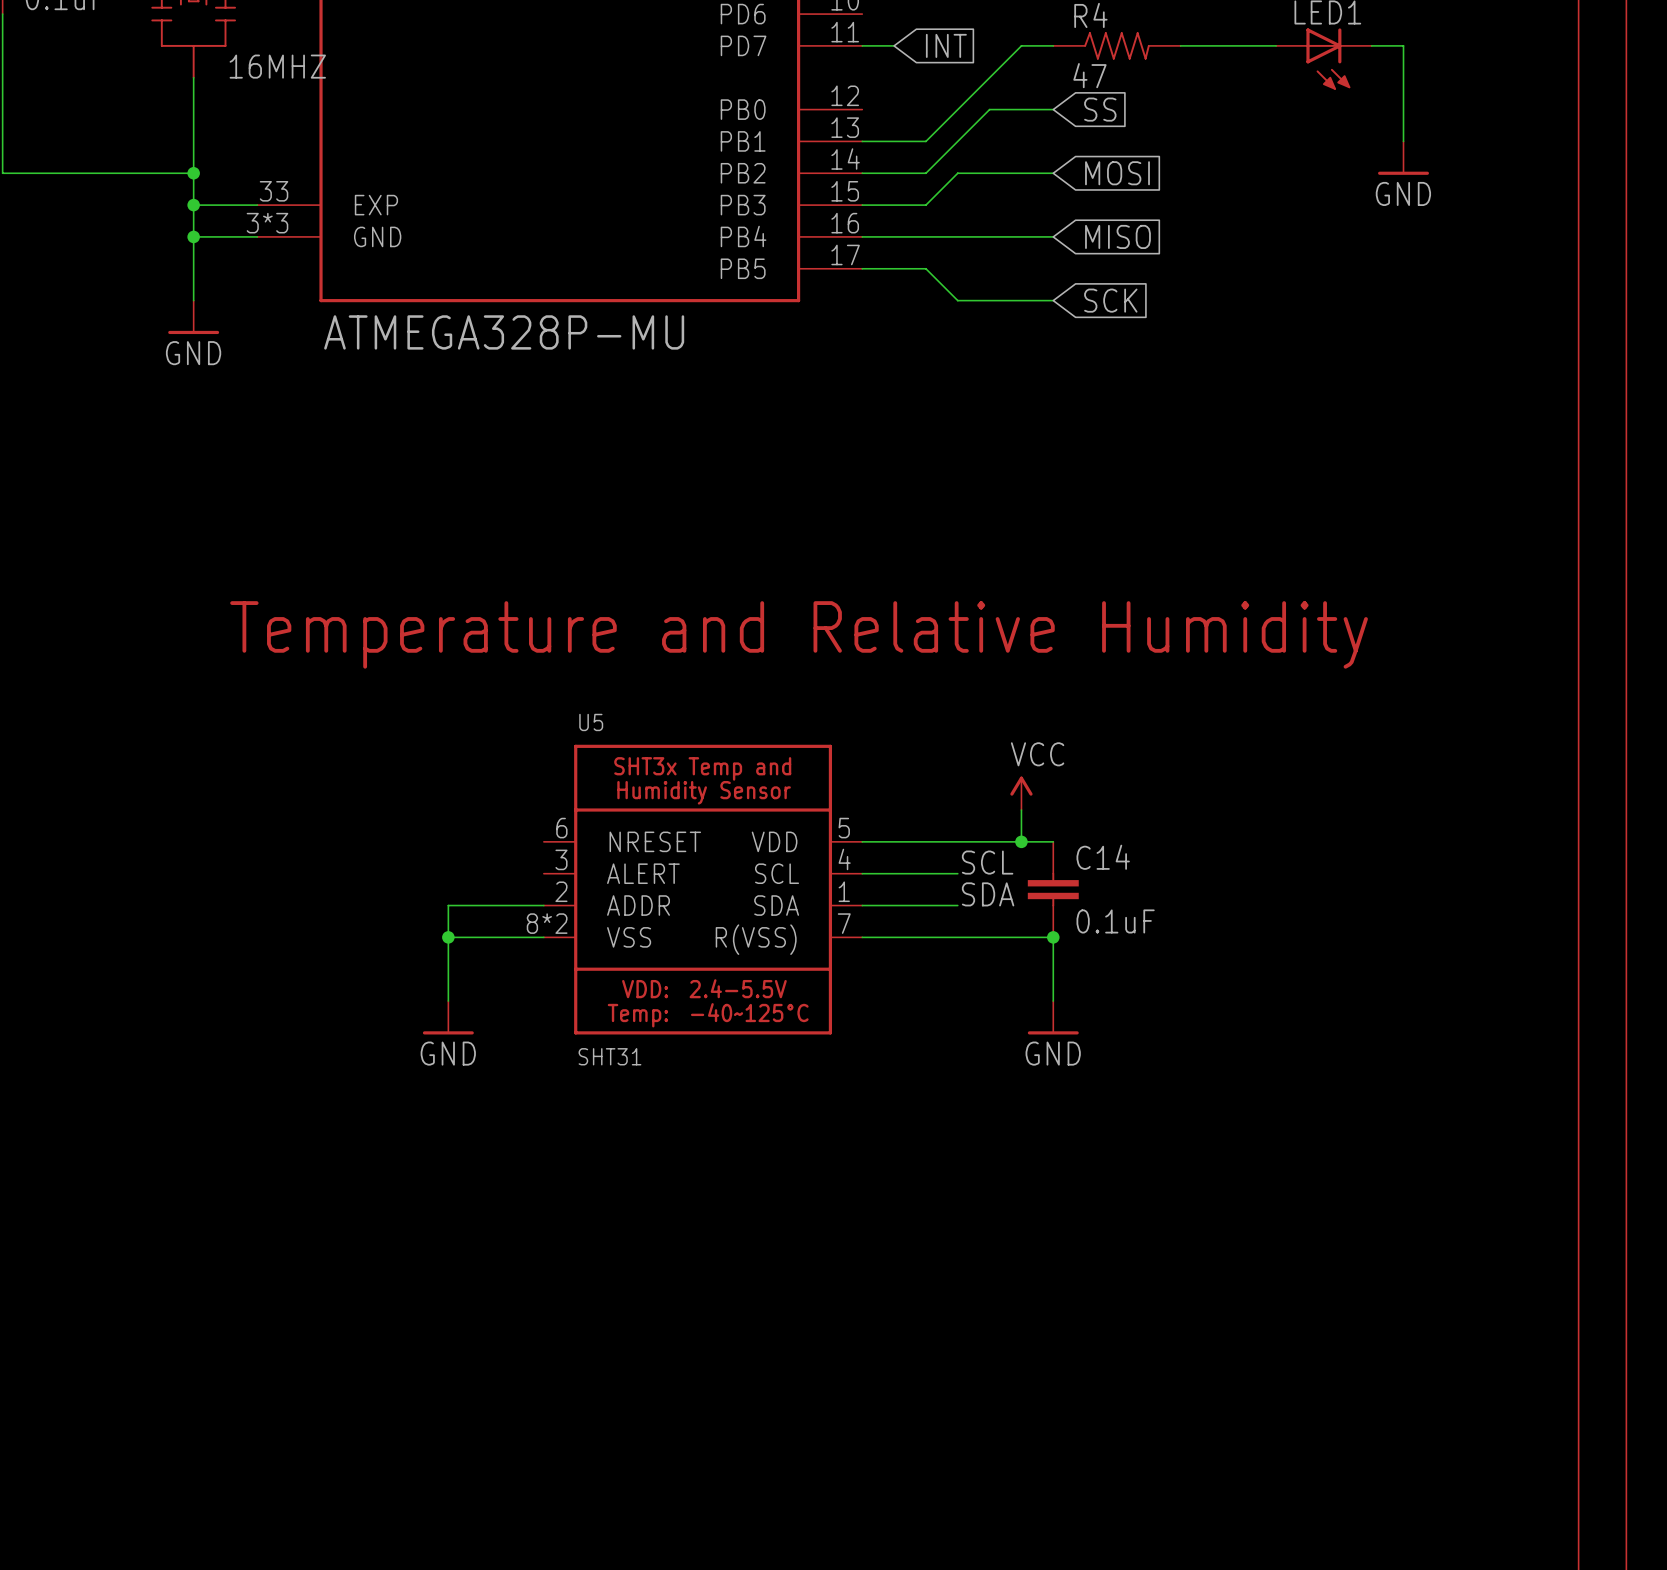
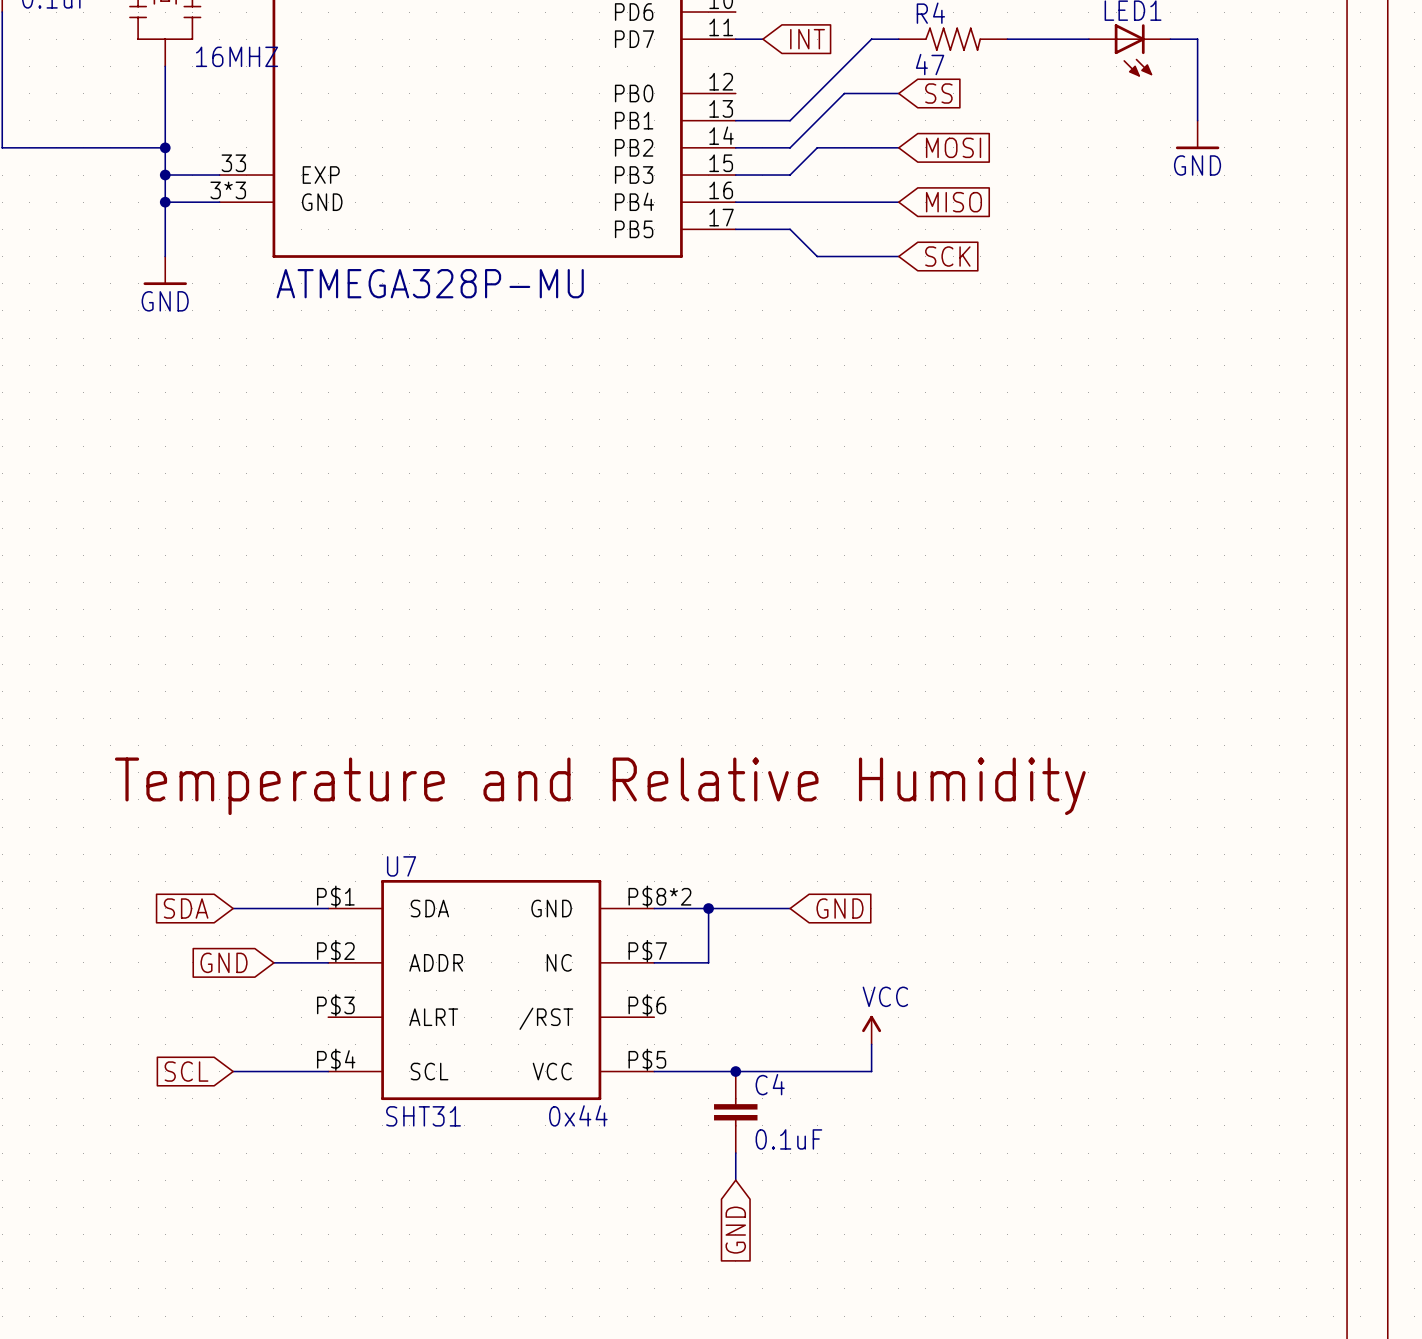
text position: Temperature and Relative Humidity (799, 634) -> Temperature and Relative Humidity (600, 786)
power symbol: VCC (1021, 793) -> none
wire: (1021, 810) (1021, 841) -> none
wire: (862, 841) (1053, 841) -> none
junction: (1021, 841) -> none
label: SCL (987, 862) -> none
wire: (862, 873) (957, 873) -> none
U5: SHT31 (703, 889) -> none
C14: 0.1uF (1053, 889) -> none
label: SDA (988, 894) -> none
wire: (543, 905) (448, 905) (448, 1001) -> none
wire: (862, 905) (957, 905) -> none
wire: (448, 937) (543, 937) -> none
junction: (448, 937) -> none
wire: (862, 937) (1053, 937) (1053, 1001) -> none
junction: (1053, 937) -> none
power symbol: GND (448, 1017) -> none
power symbol: GND (1053, 1017) -> none
global label: none -> SDA (186, 908)
wire: none -> (233, 908) (328, 908)
wire: none -> (654, 908) (790, 908)
wire: none -> (708, 908) (708, 962) (654, 962)
junction: none -> (708, 908)
global label: none -> GND (840, 908)
global label: none -> GND (224, 962)
wire: none -> (273, 962) (328, 962)
U7: none -> SHT31 (491, 990)
power symbol: none -> VCC (871, 1030)
wire: none -> (871, 1044) (871, 1071) (654, 1071)
global label: none -> SCL (186, 1071)
wire: none -> (233, 1071) (328, 1071)
junction: none -> (735, 1071)
C4: none -> 0.1uF (735, 1112)
text: none -> 0x44 (578, 1115)
wire: none -> (735, 1153) (735, 1180)
global label: none -> GND (735, 1230)

